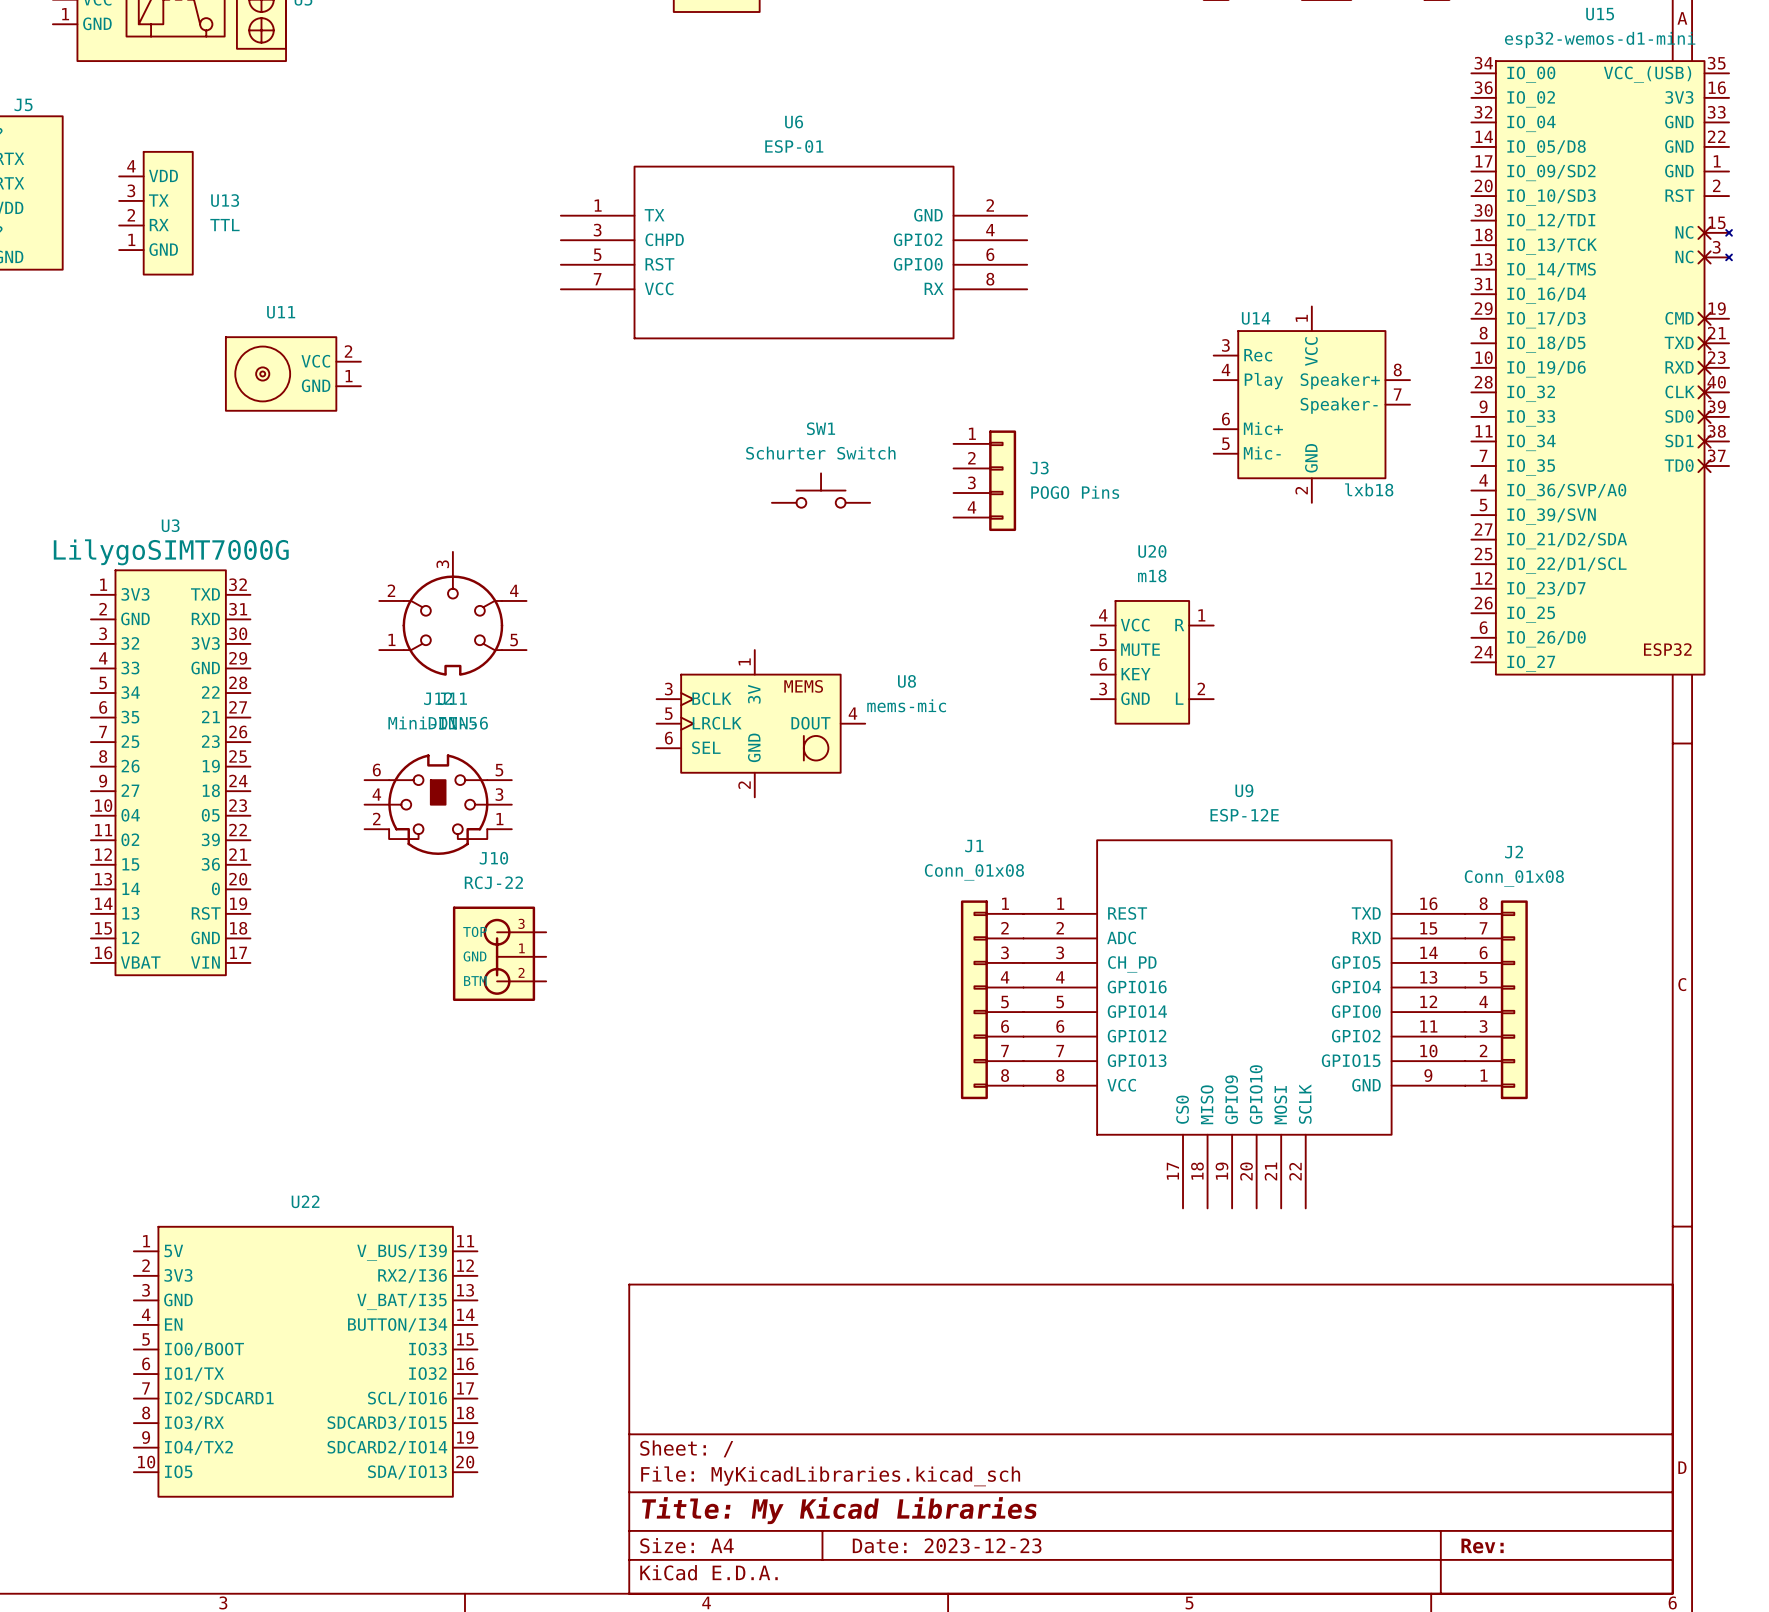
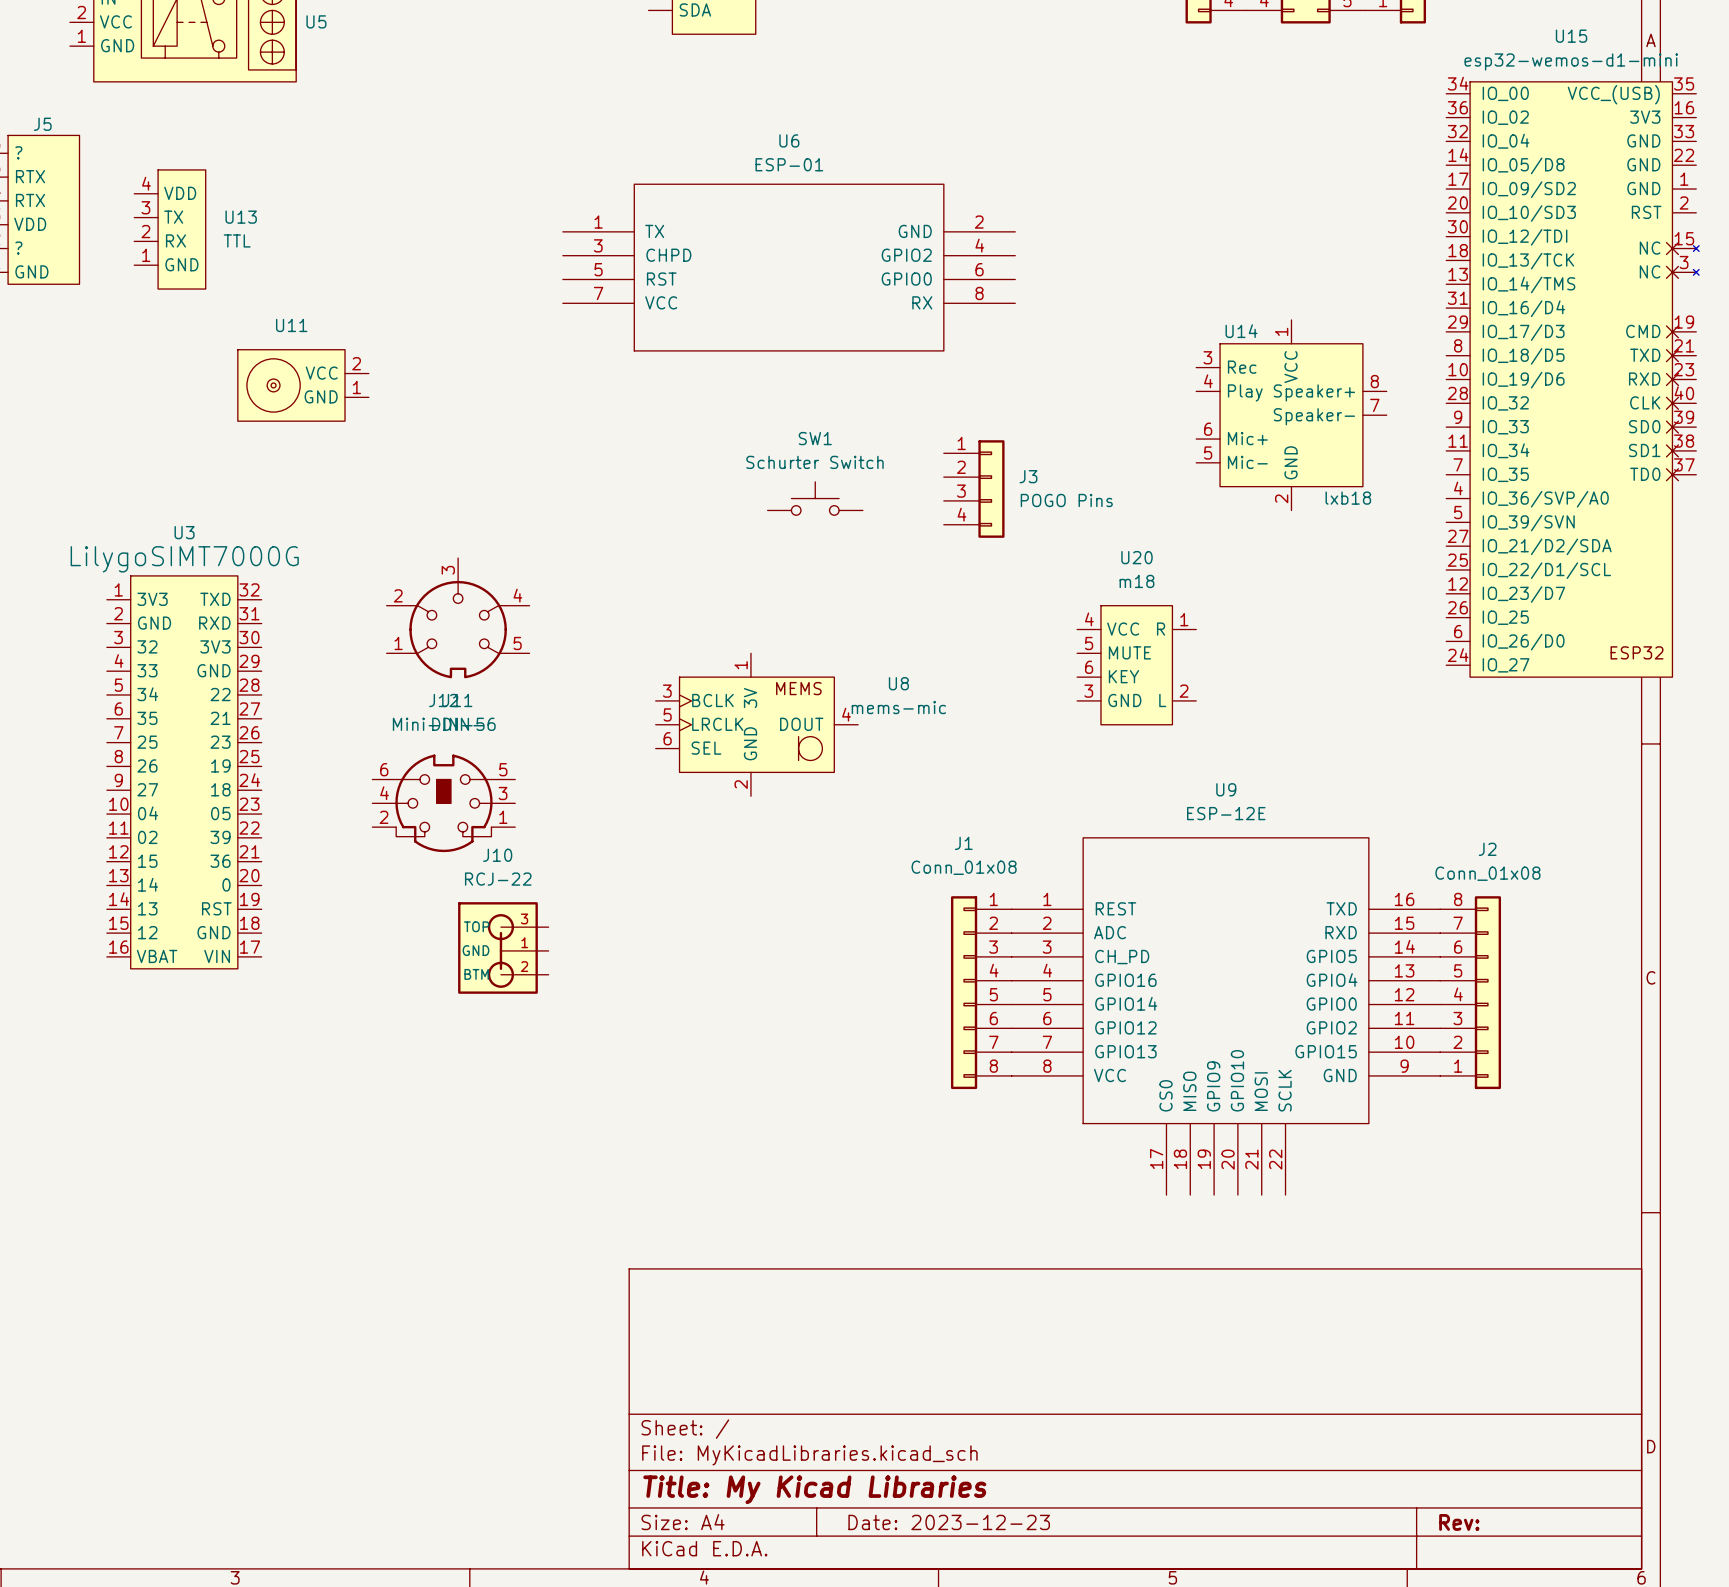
U22: (305, 1361) -> none

